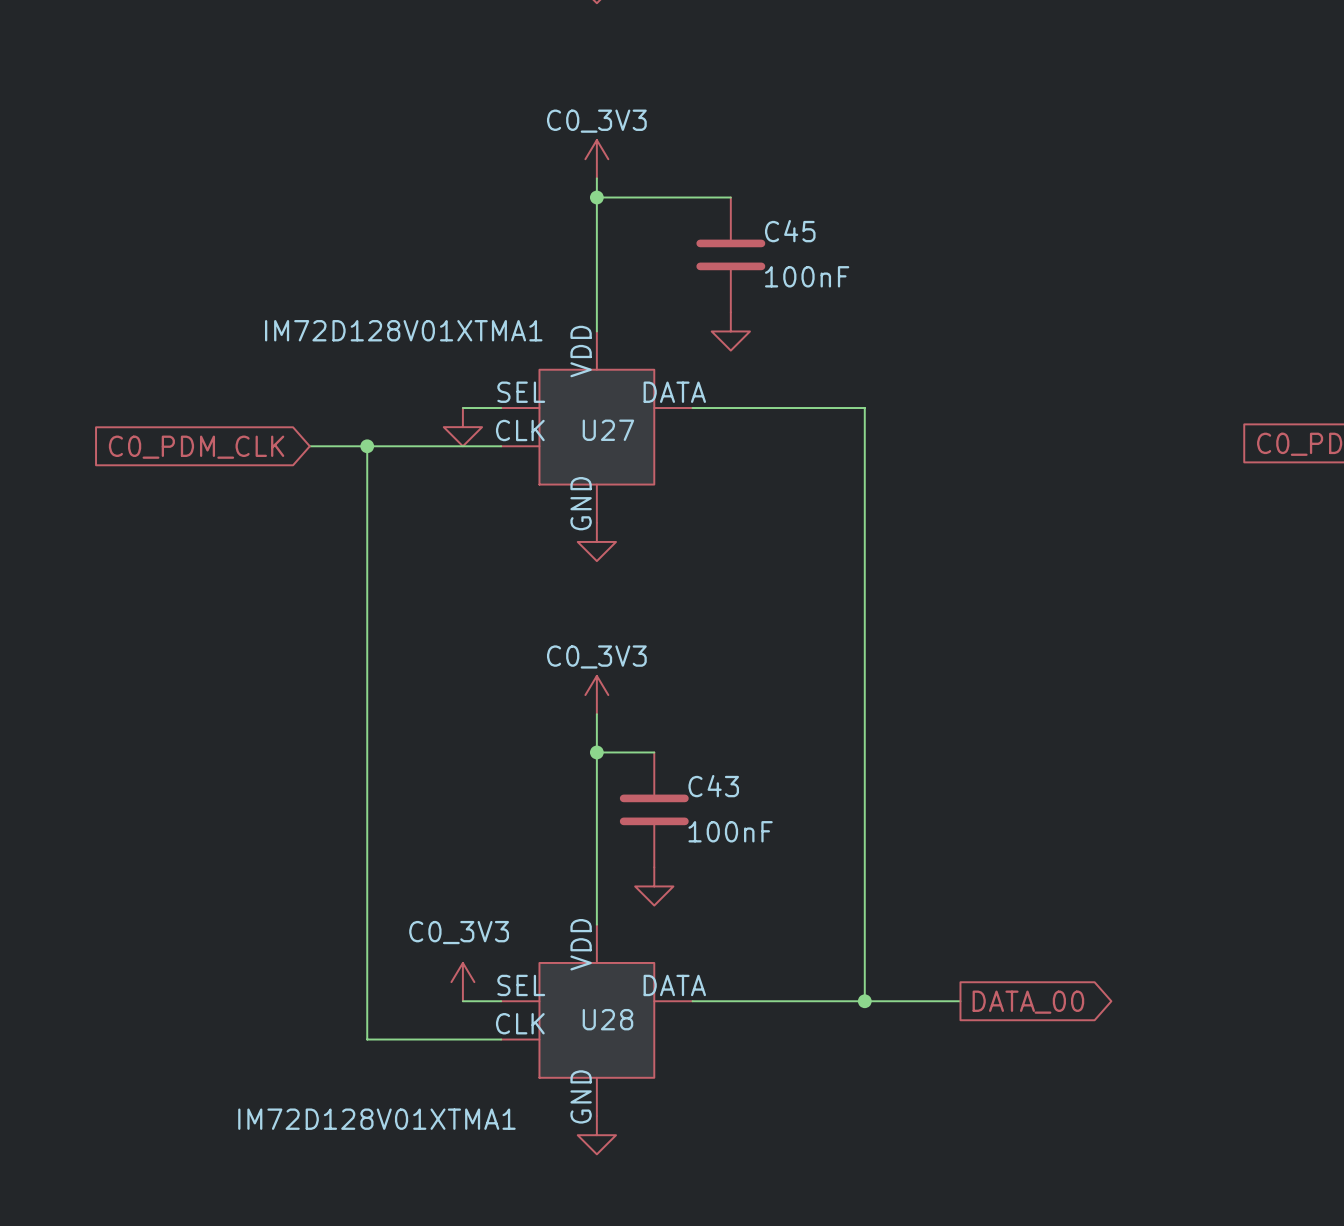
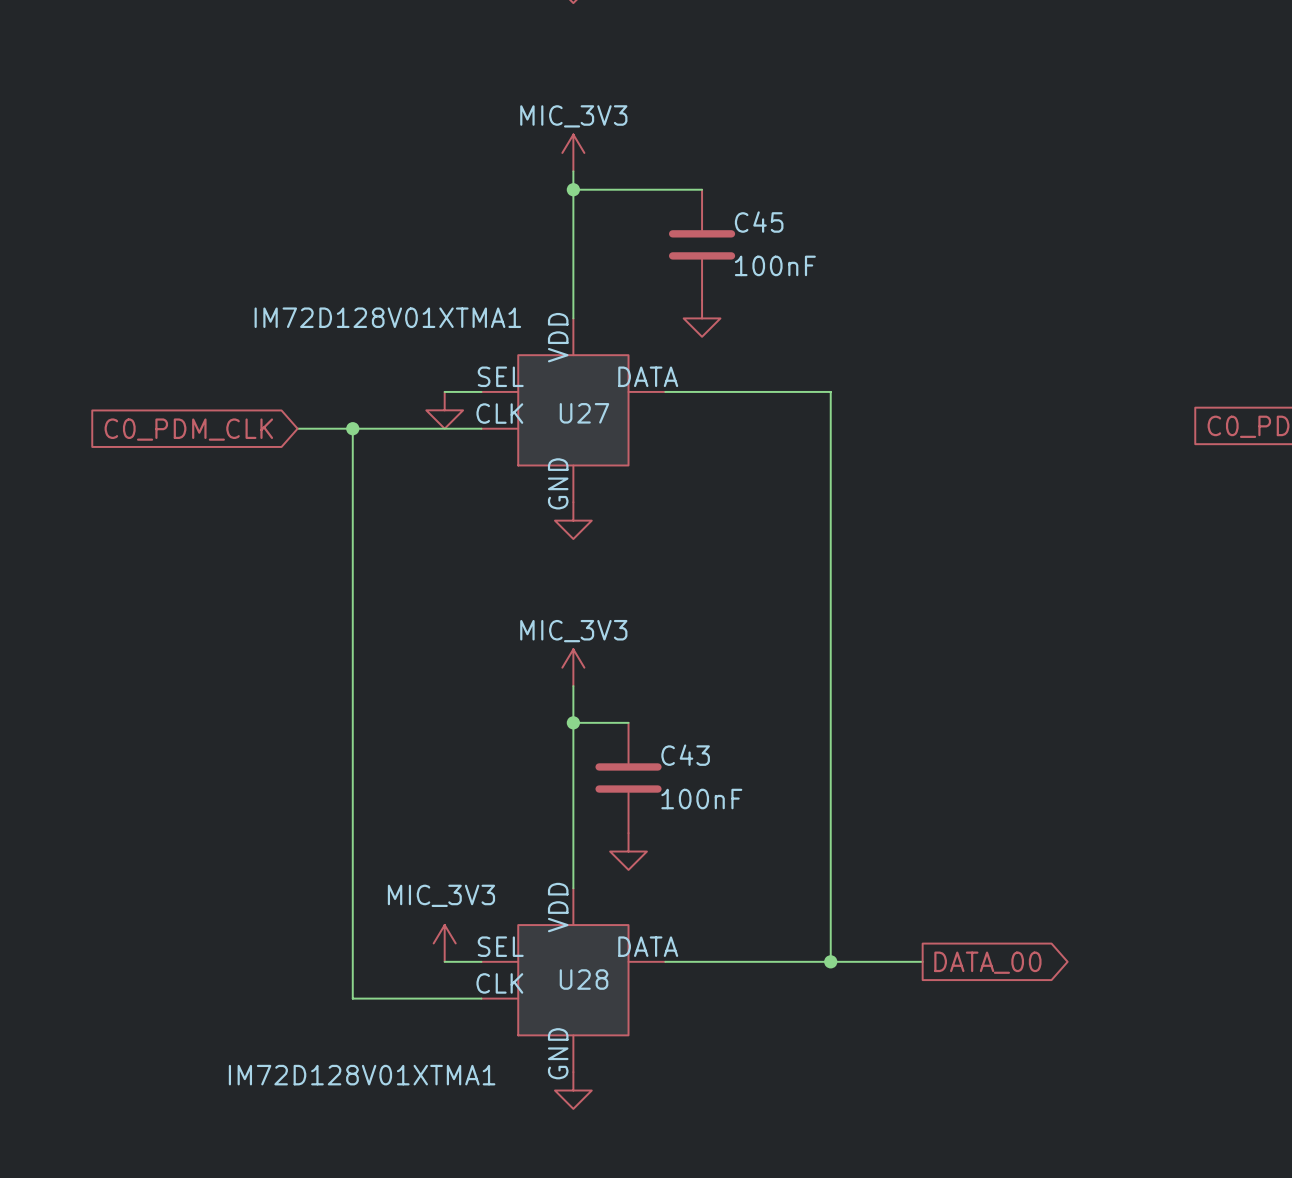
power symbol: C0_3V3 (596, 159) -> MIC_3V3 (573, 152)
power symbol: C0_3V3 (596, 695) -> MIC_3V3 (573, 667)
power symbol: C0_3V3 (462, 982) -> MIC_3V3 (444, 943)

